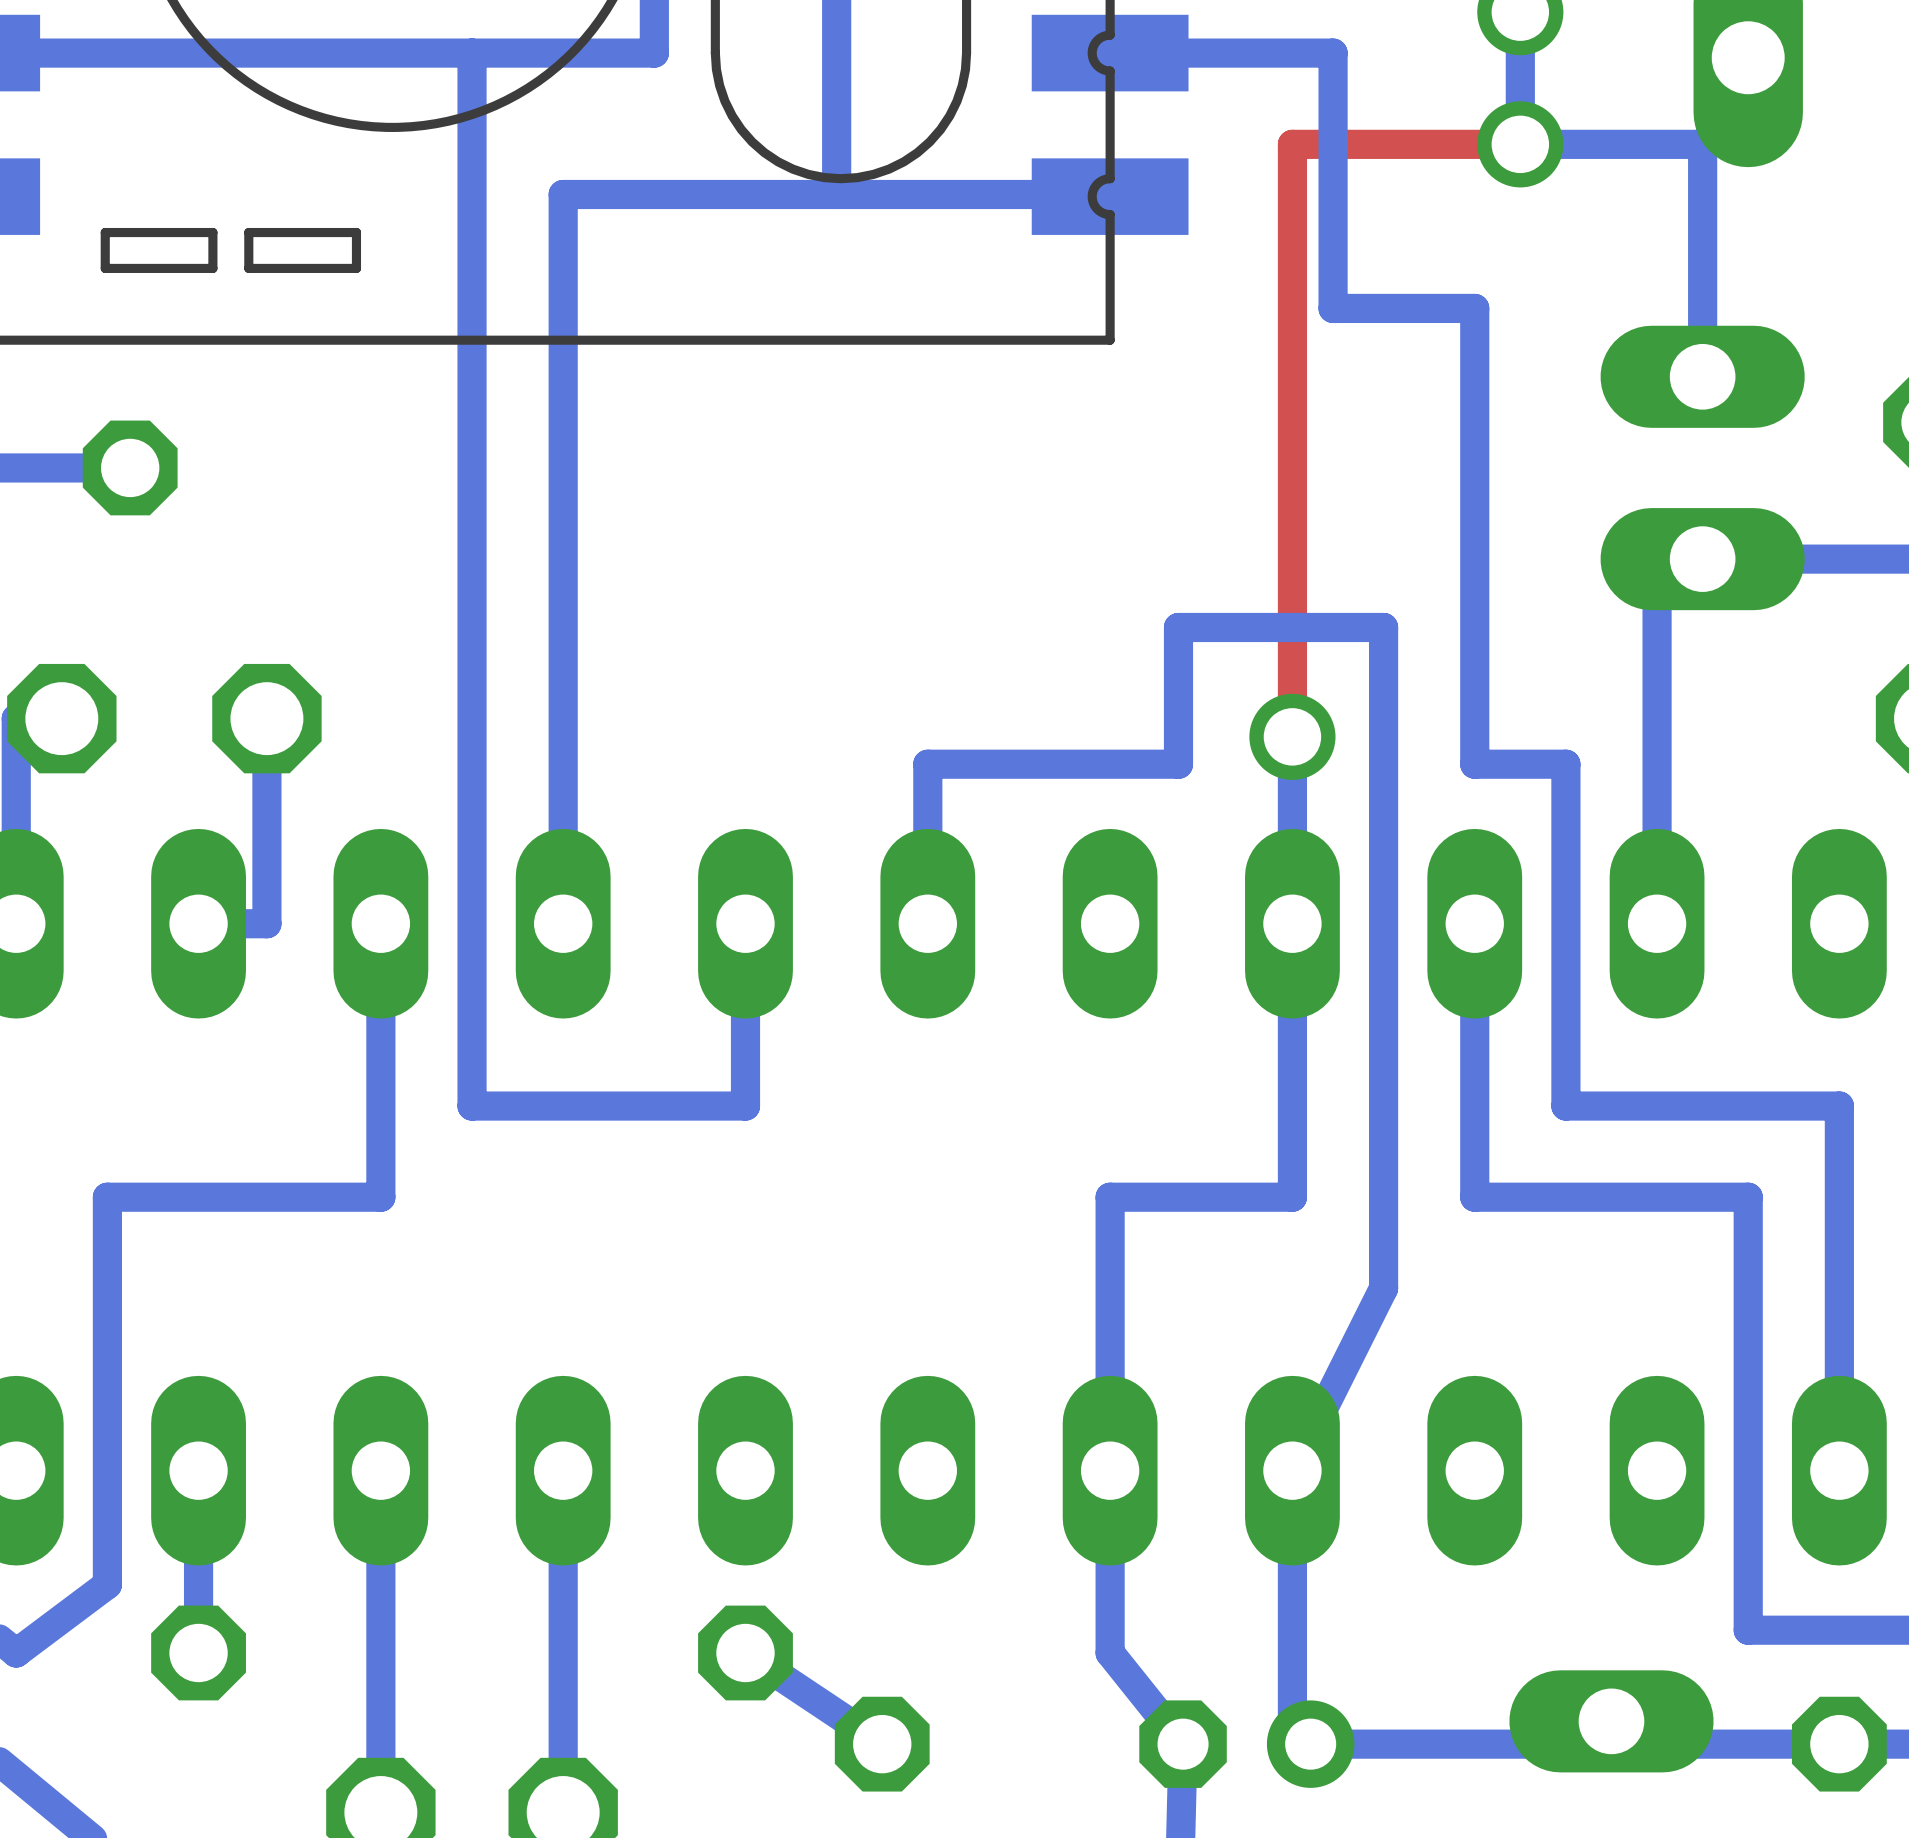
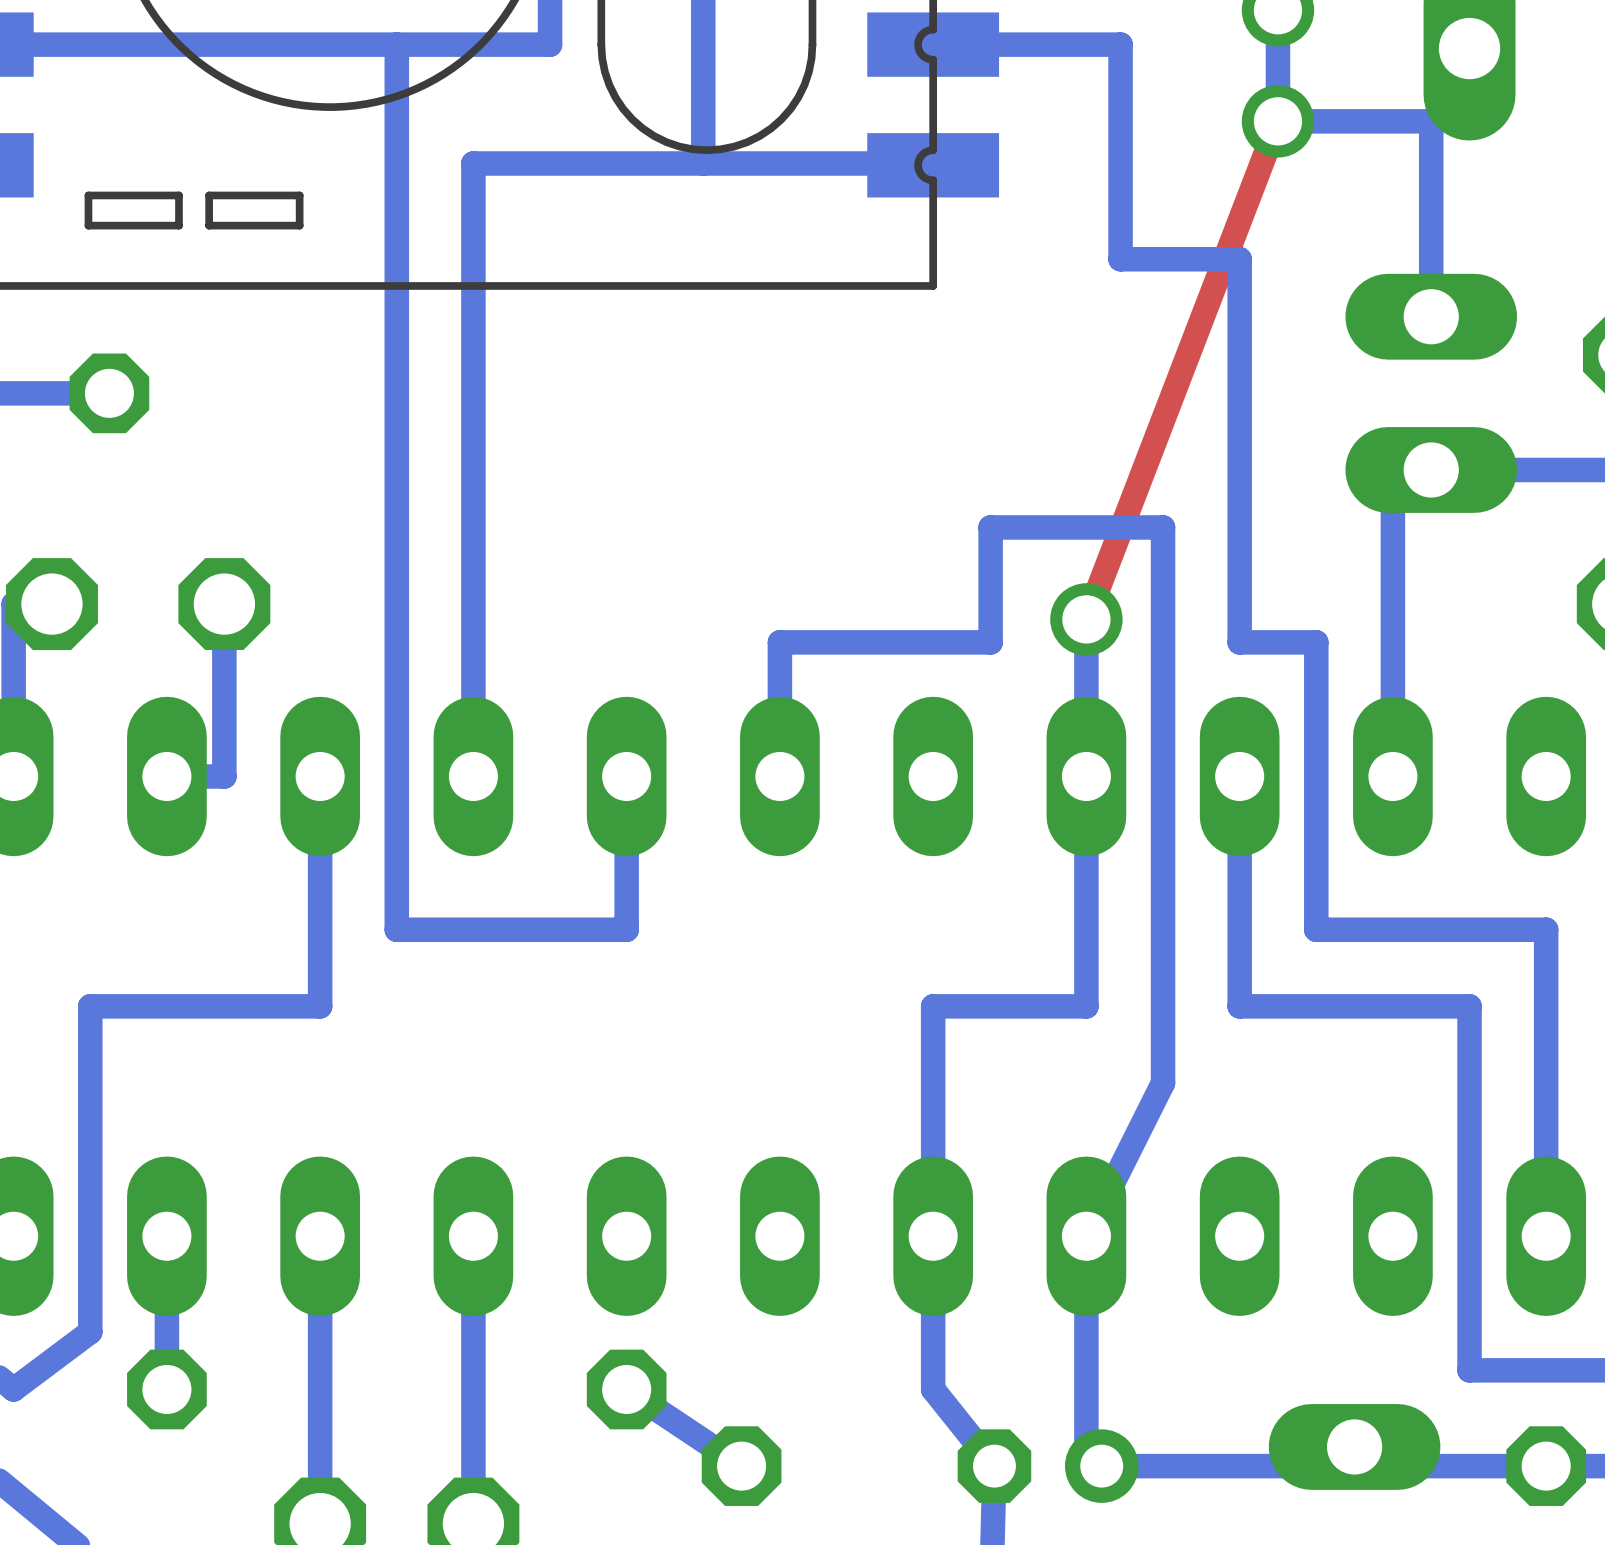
top track: (1520, 144) (1292, 144) (1292, 736) -> (1277, 121) (1086, 619)

